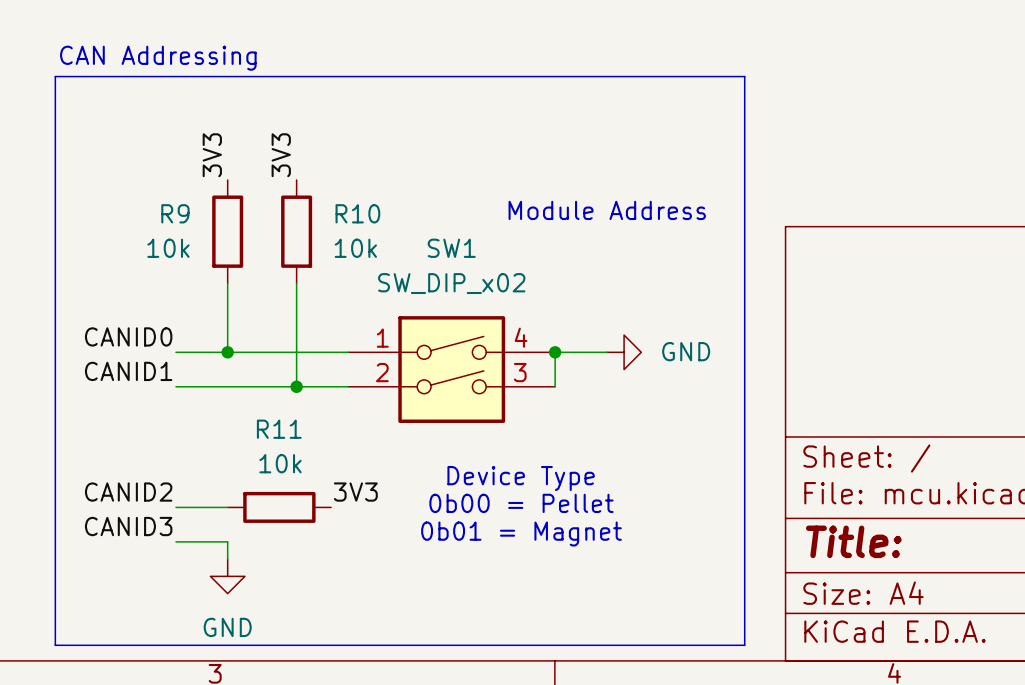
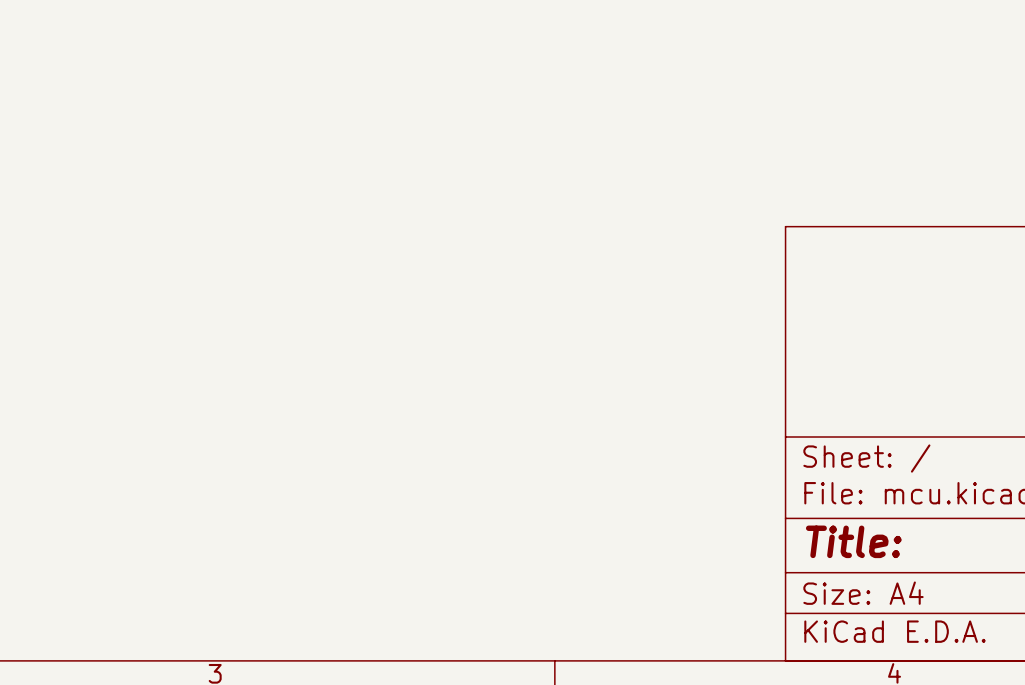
text: CAN Addressing (158, 58) -> none
line: (55, 76) (744, 76) (744, 645) (55, 645) (55, 76) -> none
label: 3V3 (212, 155) -> none
label: 3V3 (281, 155) -> none
text: Module Address (607, 210) -> none
R9: 10k (227, 231) -> none
R10: 10k (296, 231) -> none
wire: (227, 283) (227, 352) -> none
wire: (296, 283) (296, 386) -> none
label: CANID0 (128, 336) -> none
wire: (175, 352) (348, 352) -> none
junction: (227, 352) -> none
junction: (555, 352) -> none
wire: (606, 352) (555, 352) (555, 386) -> none
power symbol: GND (624, 352) -> none
SW1: SW_DIP_x02 (451, 369) -> none
label: CANID1 (128, 371) -> none
wire: (175, 386) (348, 386) -> none
junction: (296, 386) -> none
text: Device Type (521, 478) -> none
label: CANID2 (128, 492) -> none
label: 3V3 (355, 492) -> none
text: 0b00 = Pellet (521, 503) -> none
wire: (175, 507) (227, 507) -> none
R11: 10k (279, 507) -> none
label: CANID3 (128, 526) -> none
text: 0b01 = Magnet (521, 534) -> none
wire: (175, 541) (227, 541) (227, 559) -> none
power symbol: GND (227, 576) -> none

